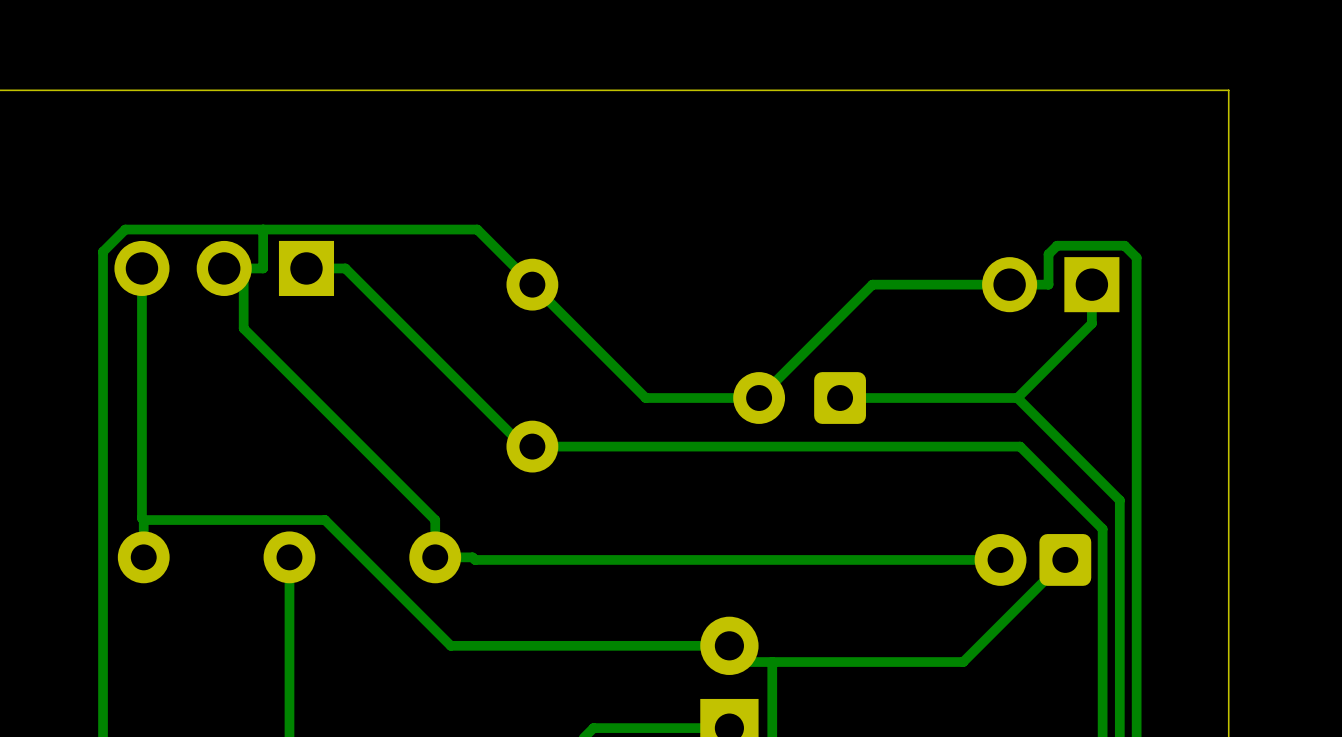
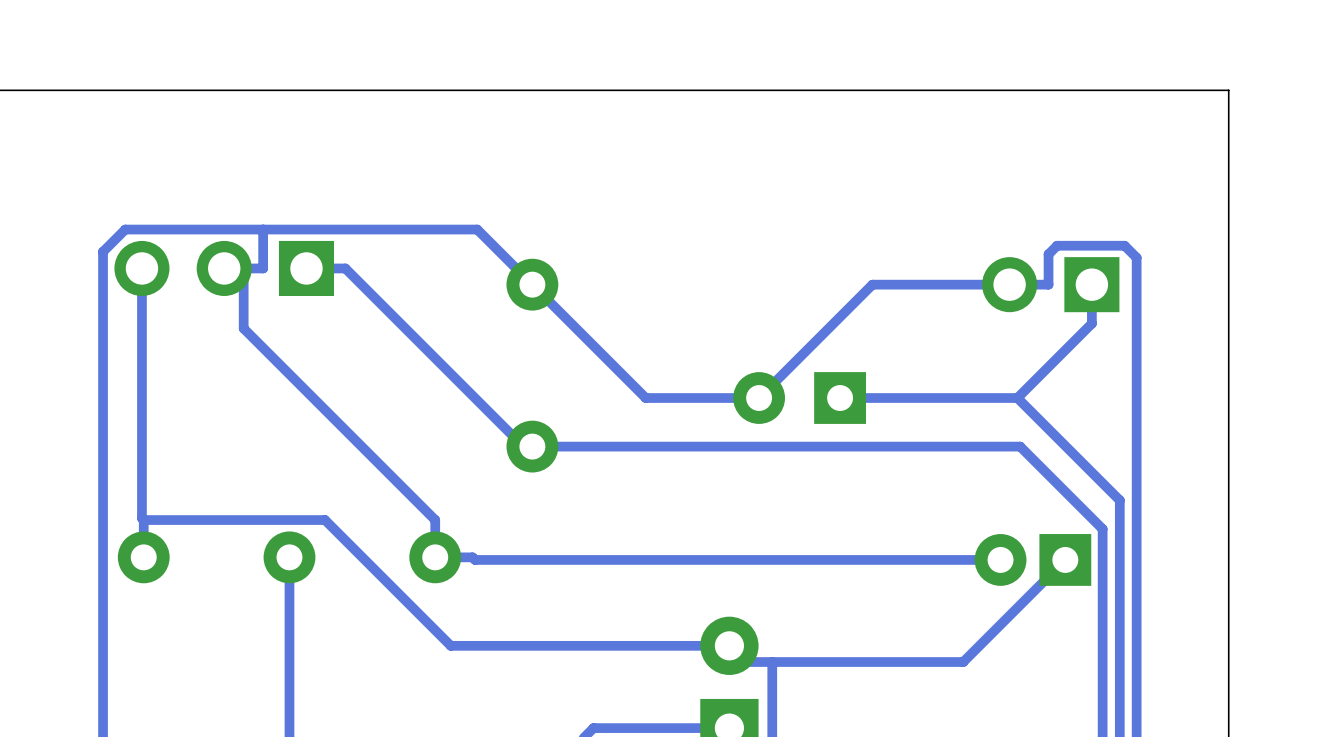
part footprint: [733, 372, 866, 424] -> [733, 372, 866, 424]
part footprint: [974, 534, 1092, 586] -> [974, 534, 1092, 586]

